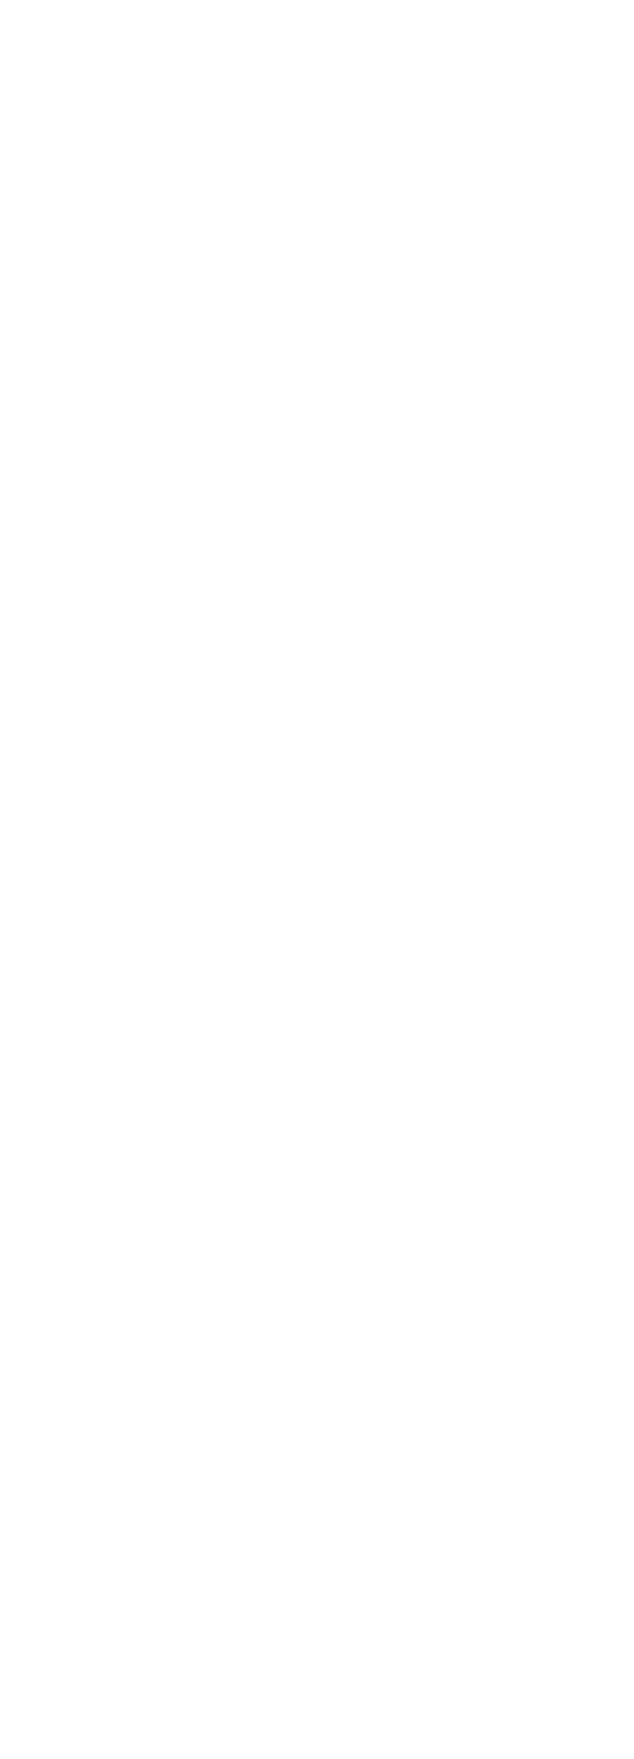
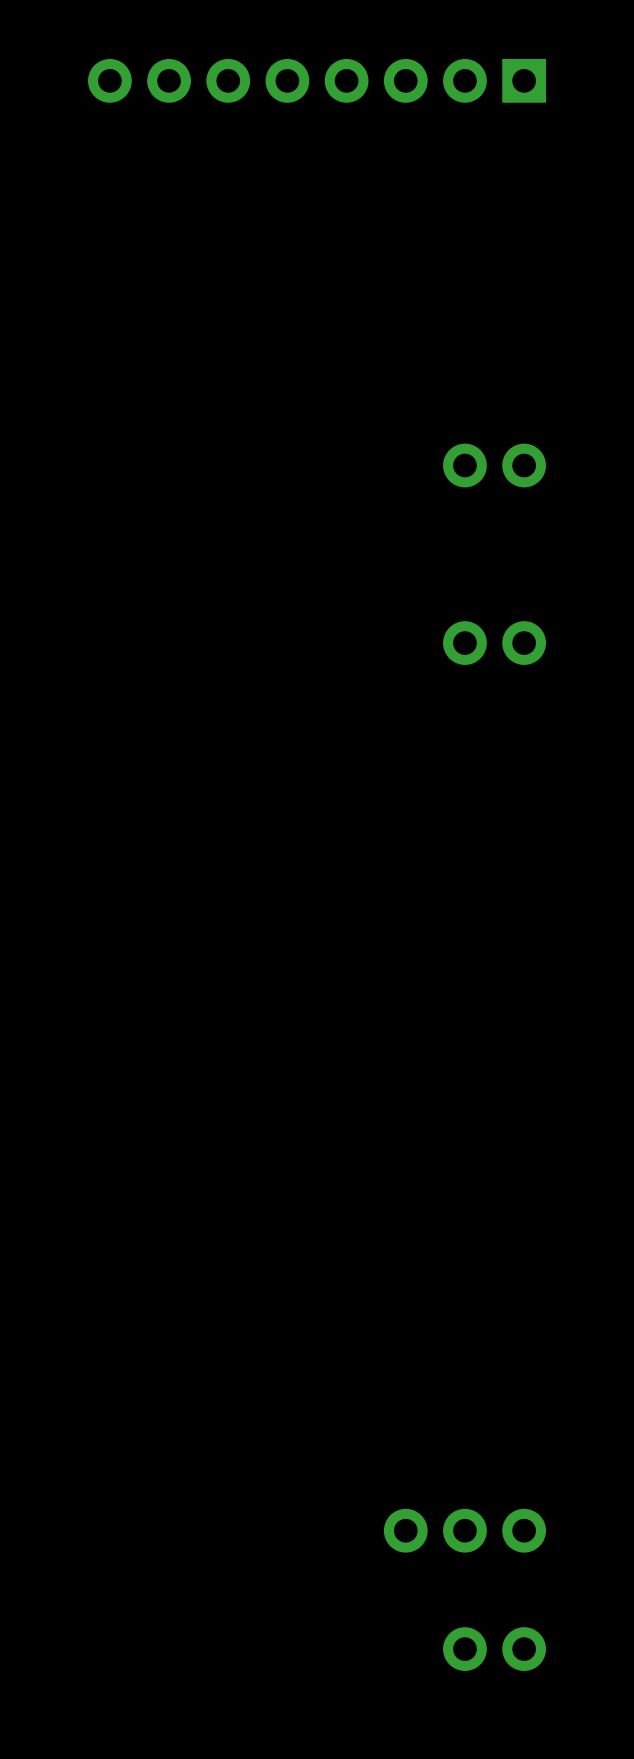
part: none -> (317, 80)
part: none -> (494, 465)
part: none -> (494, 643)
part: none -> (464, 1530)
part: none -> (494, 1649)

